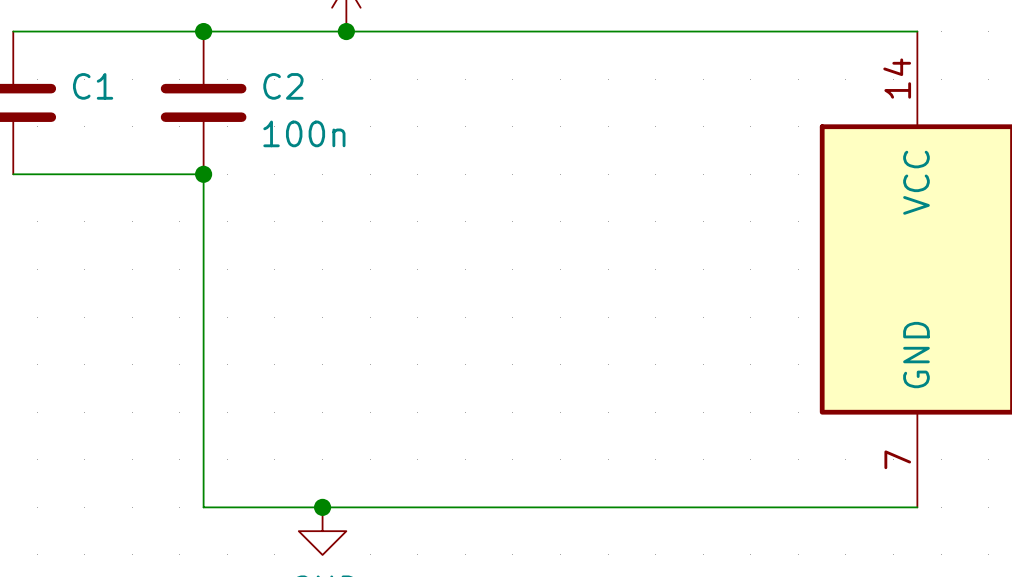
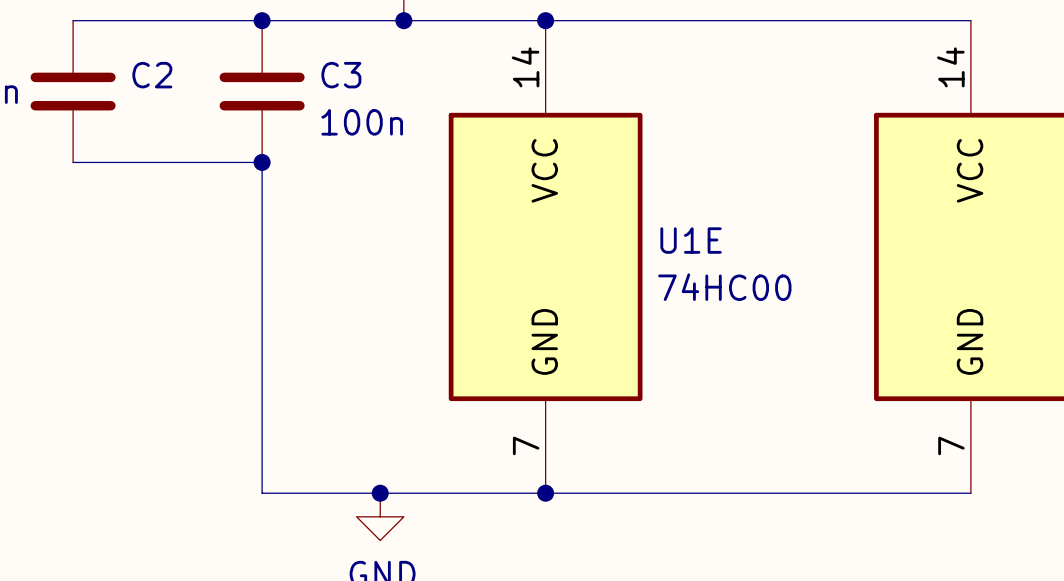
junction: none -> (545, 20)
C1 name: C1 (93, 86) -> C2 (152, 75)
C2 name: C2 (283, 86) -> C3 (341, 75)
U1E: none -> 74HC00 (545, 256)
junction: none -> (545, 493)

